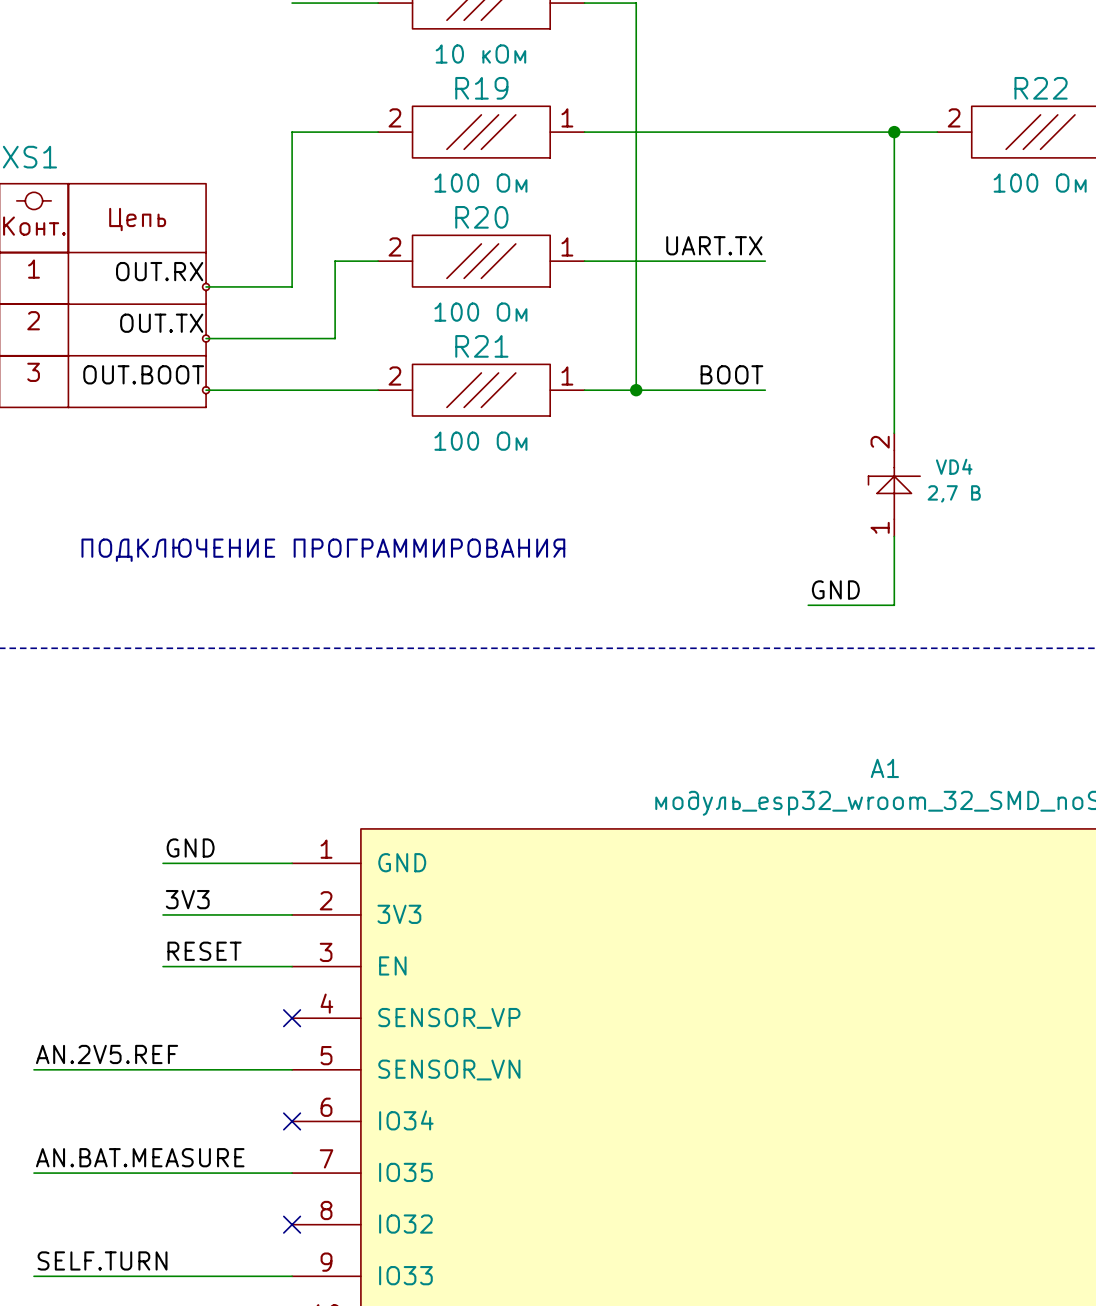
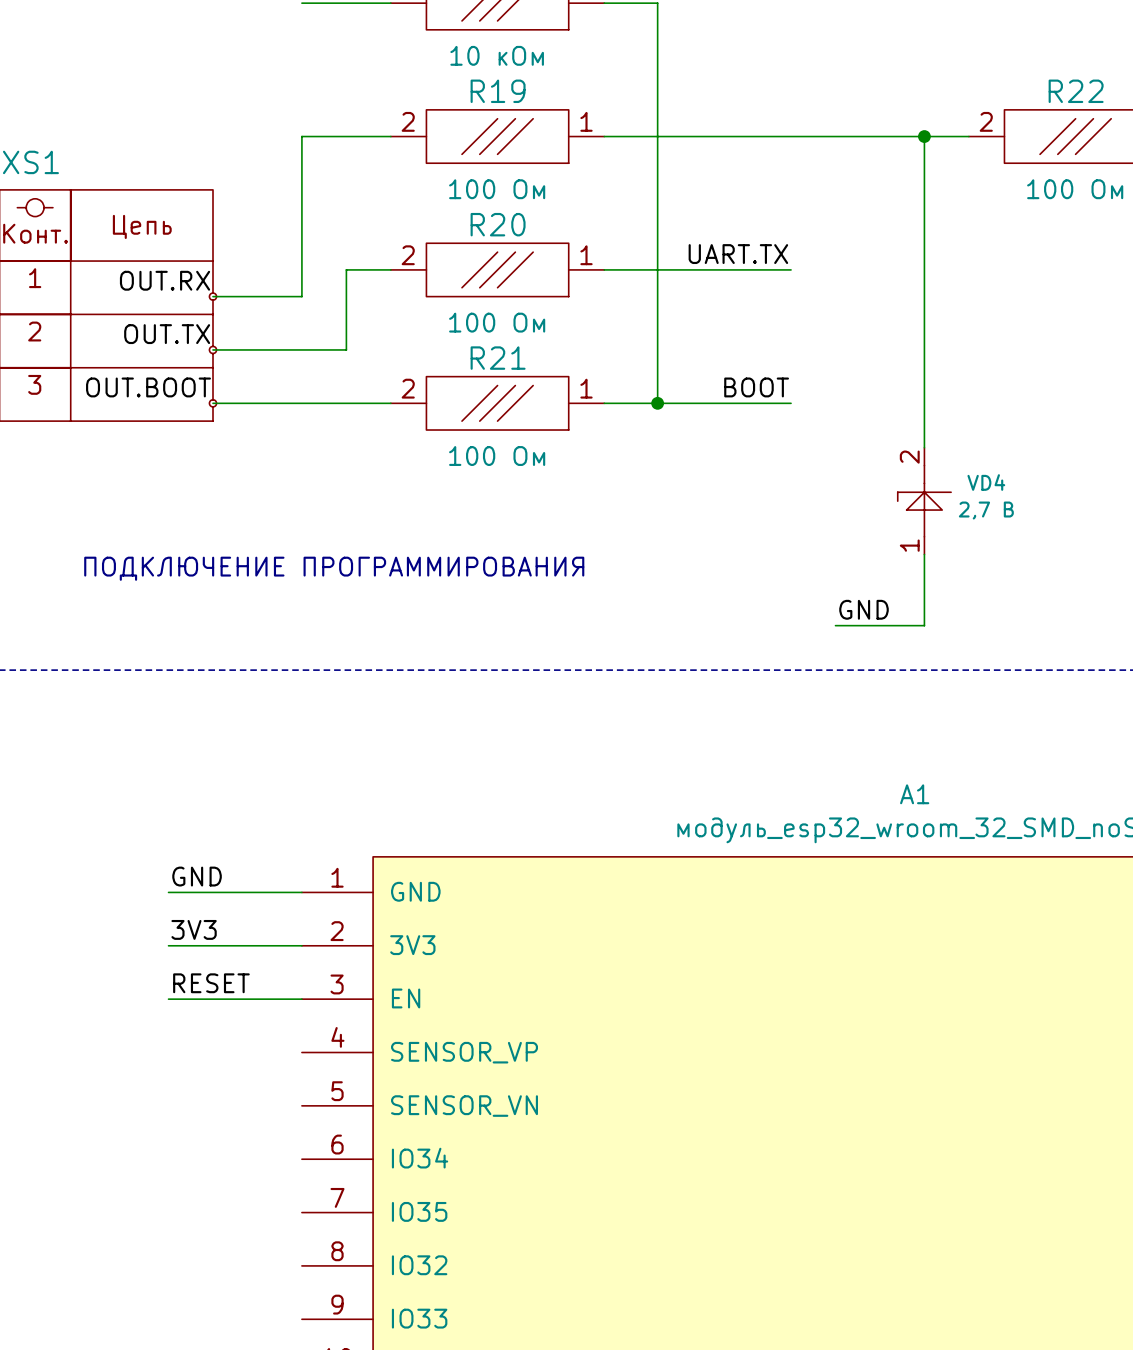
no-connect mark: (292, 1018) -> none
label: AN.2V5.REF (107, 1054) -> none
wire: (34, 1069) (292, 1069) -> none
no-connect mark: (292, 1121) -> none
label: AN.BAT.MEASURE (140, 1157) -> none
wire: (34, 1173) (292, 1173) -> none
no-connect mark: (292, 1224) -> none
label: SELF.TURN (102, 1260) -> none
wire: (34, 1276) (292, 1276) -> none

